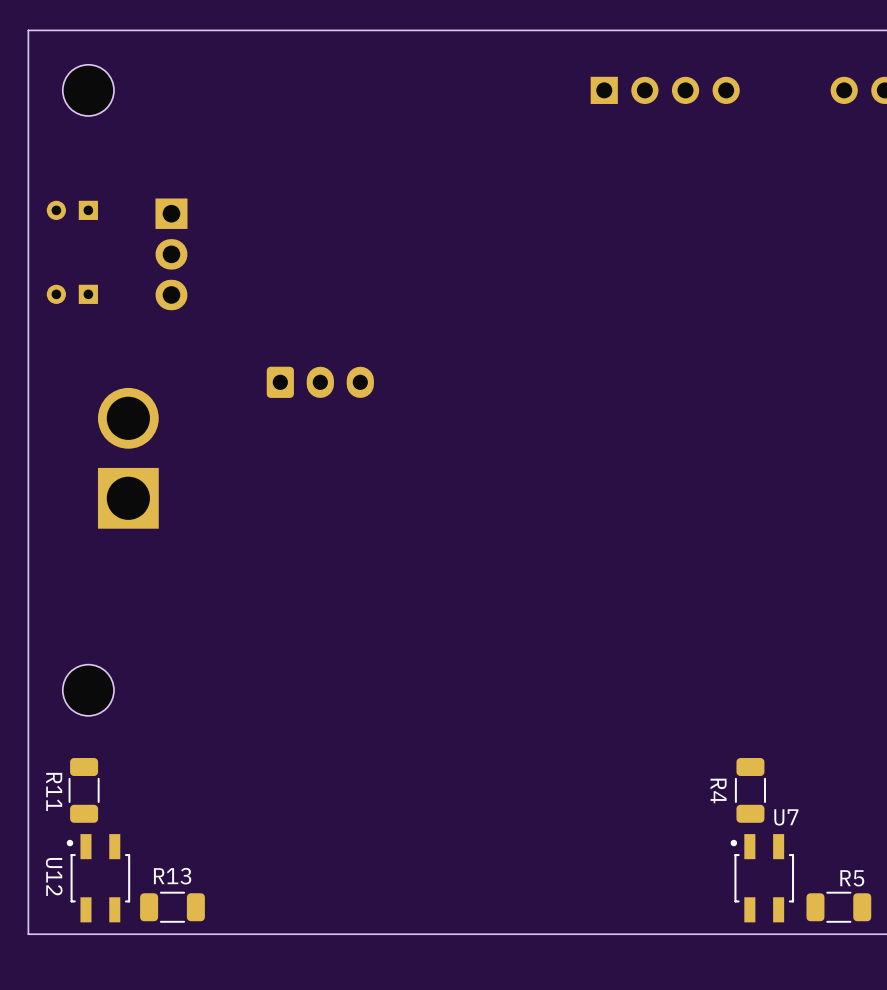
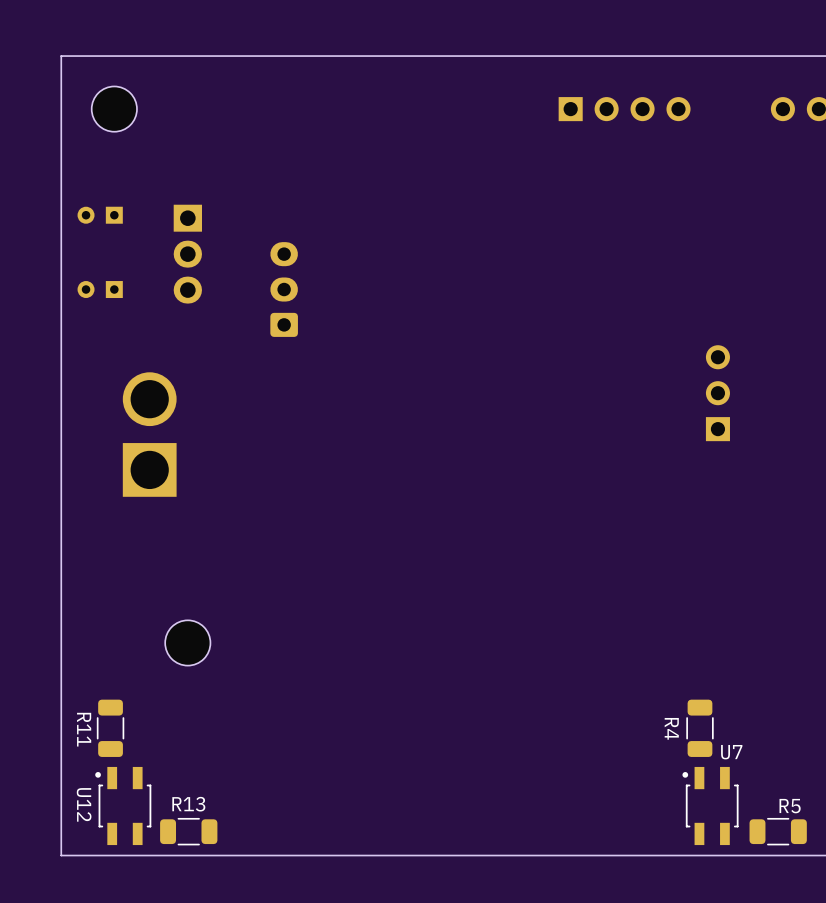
part rotation: 0° (320, 382) -> 90° counterclockwise (284, 289)
part position: (320, 382) -> (284, 289)
part: none -> (717, 393)
part position: (88, 690) -> (187, 642)

